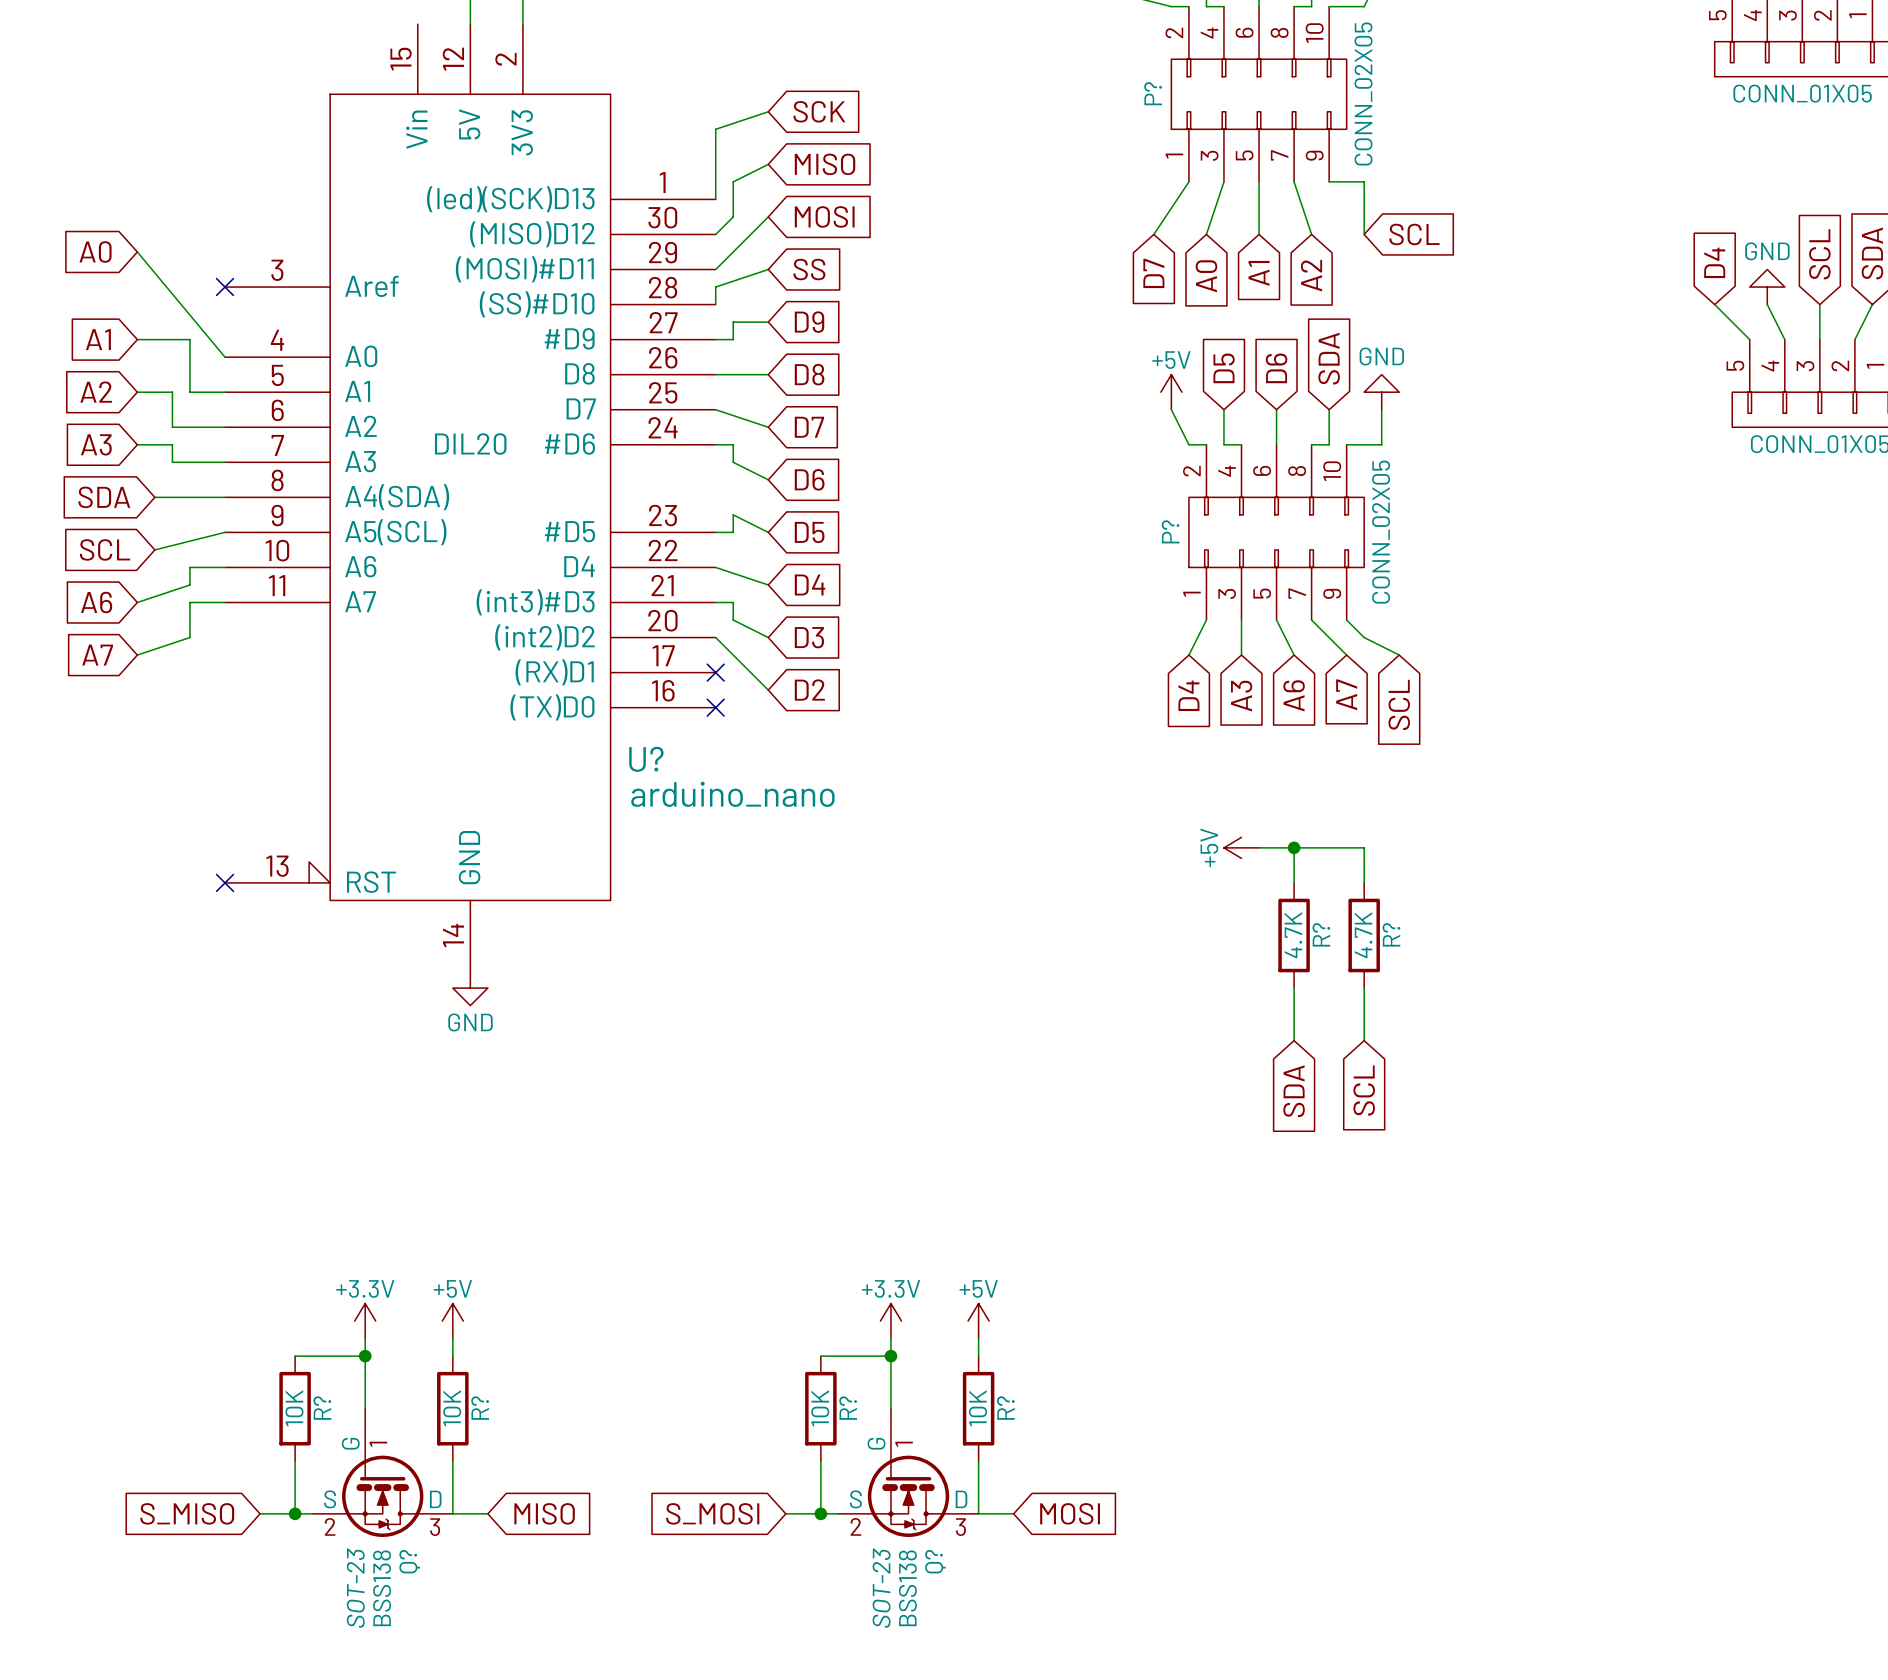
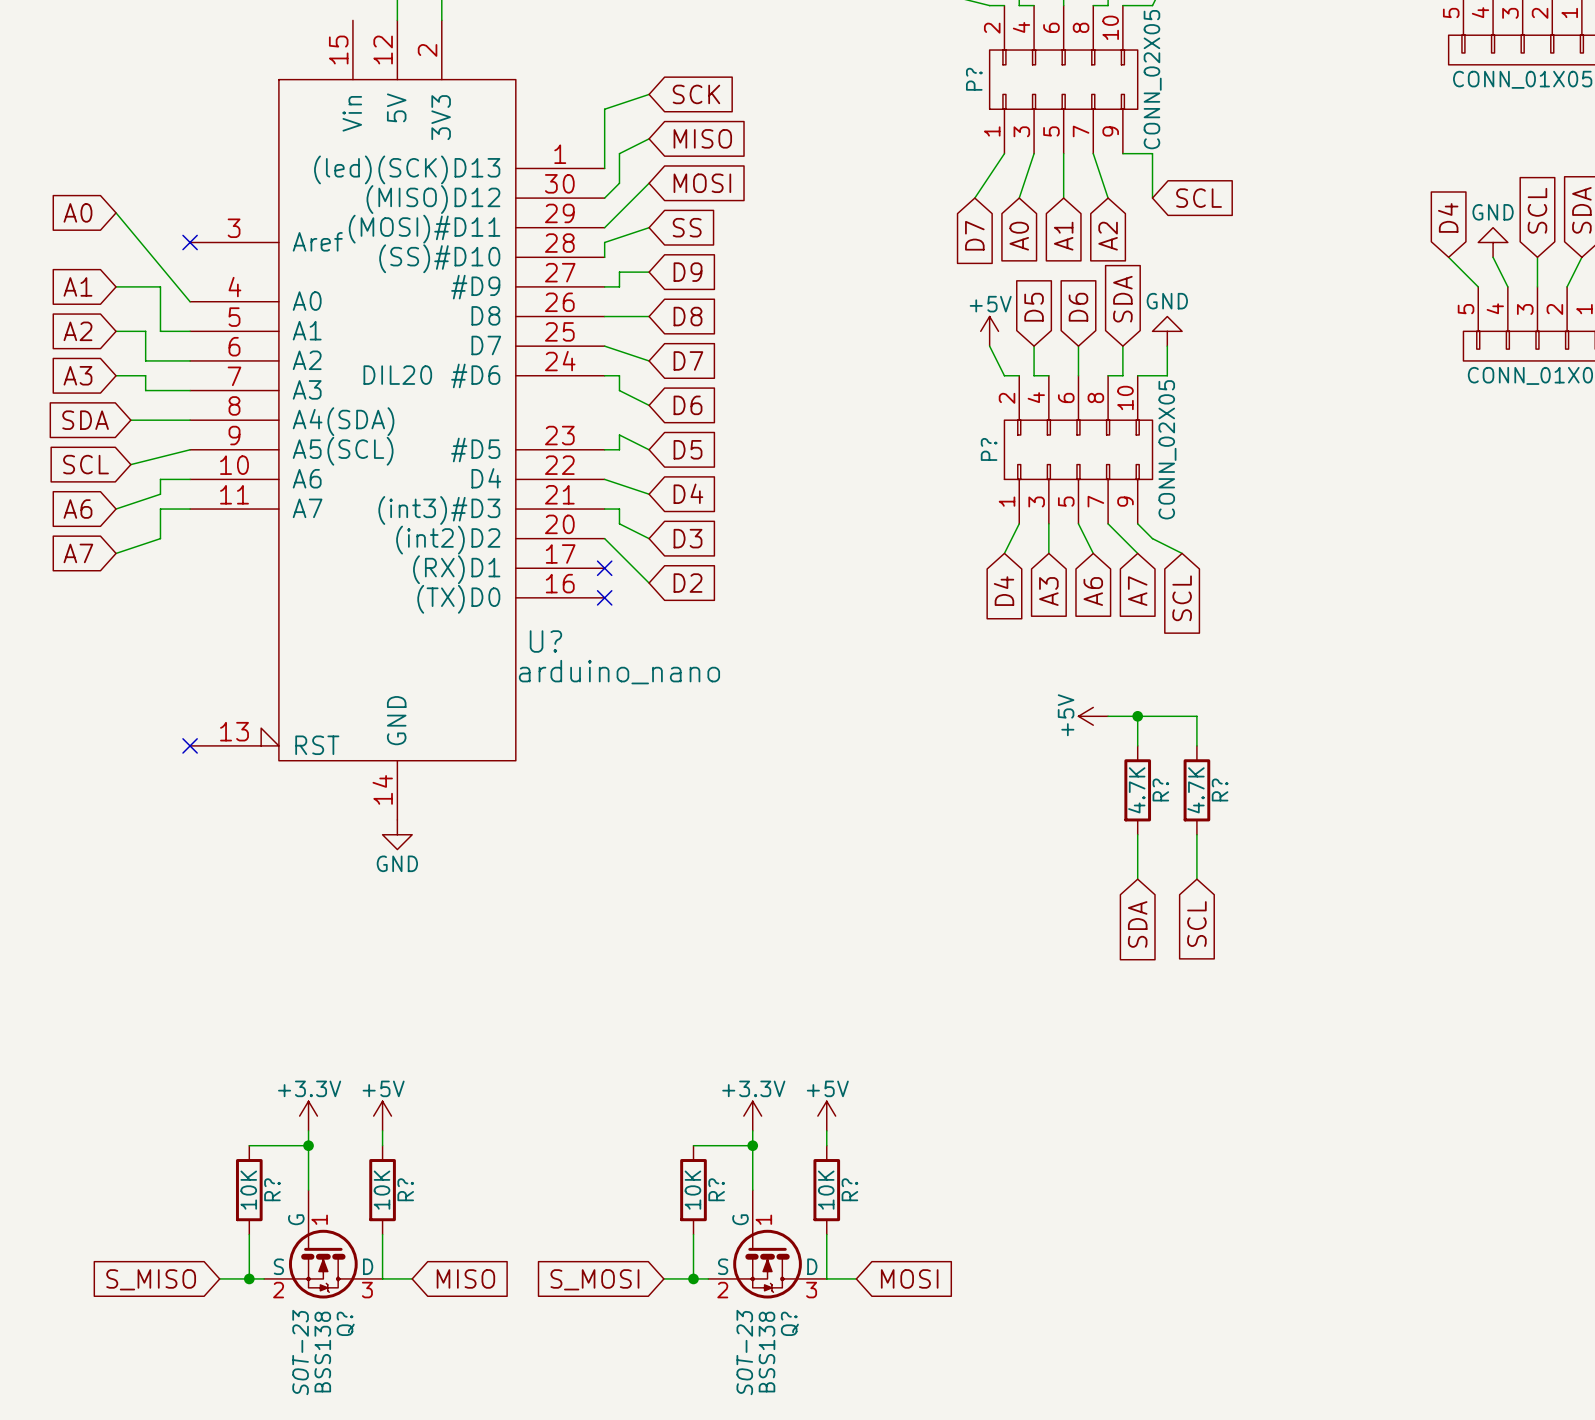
power symbol position: +5V (1241, 847) -> +5V (1093, 716)
wire: (1294, 847) (1294, 882) -> (1137, 716) (1137, 745)
junction position: (1294, 847) -> (1137, 716)
wire: (1364, 847) (1364, 882) -> (1152, 716) (1196, 716) (1196, 745)
R?: 4.7K (1294, 935) -> none
R? position: (1364, 935) -> (1137, 790)
R?: none -> 4.7K (1196, 790)
wire: (1294, 988) (1294, 1040) -> (1137, 834) (1137, 879)
wire: (1364, 988) (1364, 1040) -> (1196, 834) (1196, 879)
global label position: SCL (1364, 1090) -> SCL (1196, 924)
global label position: SDA (1294, 1091) -> SDA (1137, 924)

